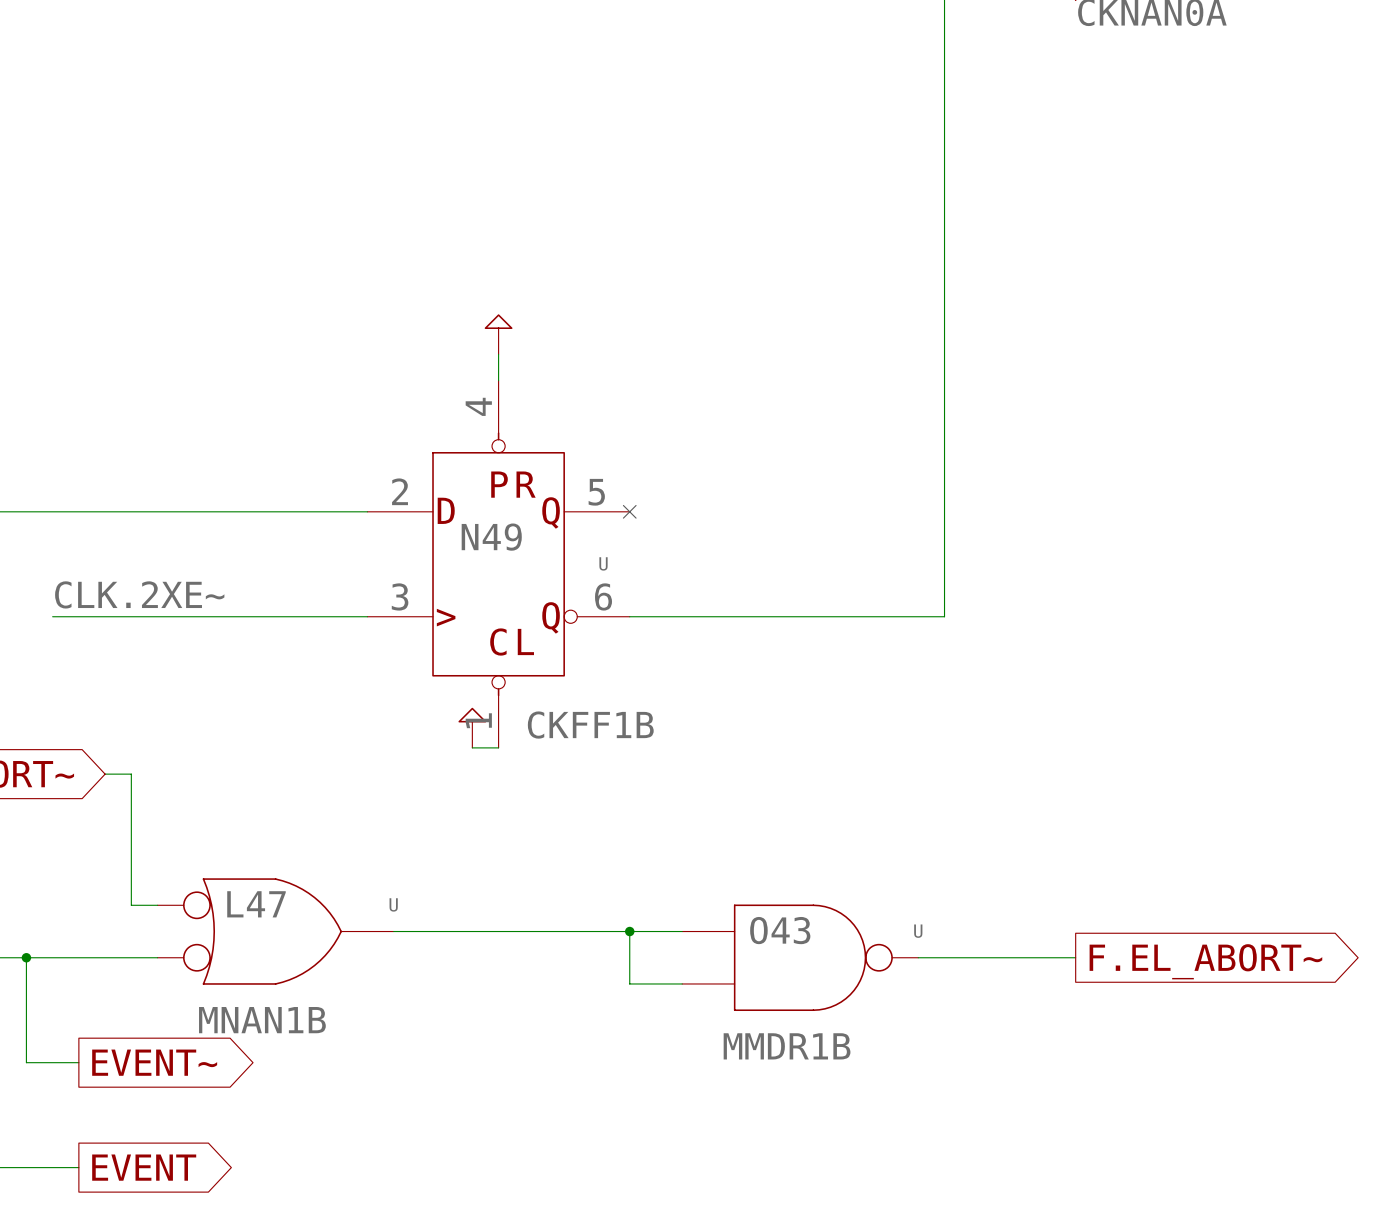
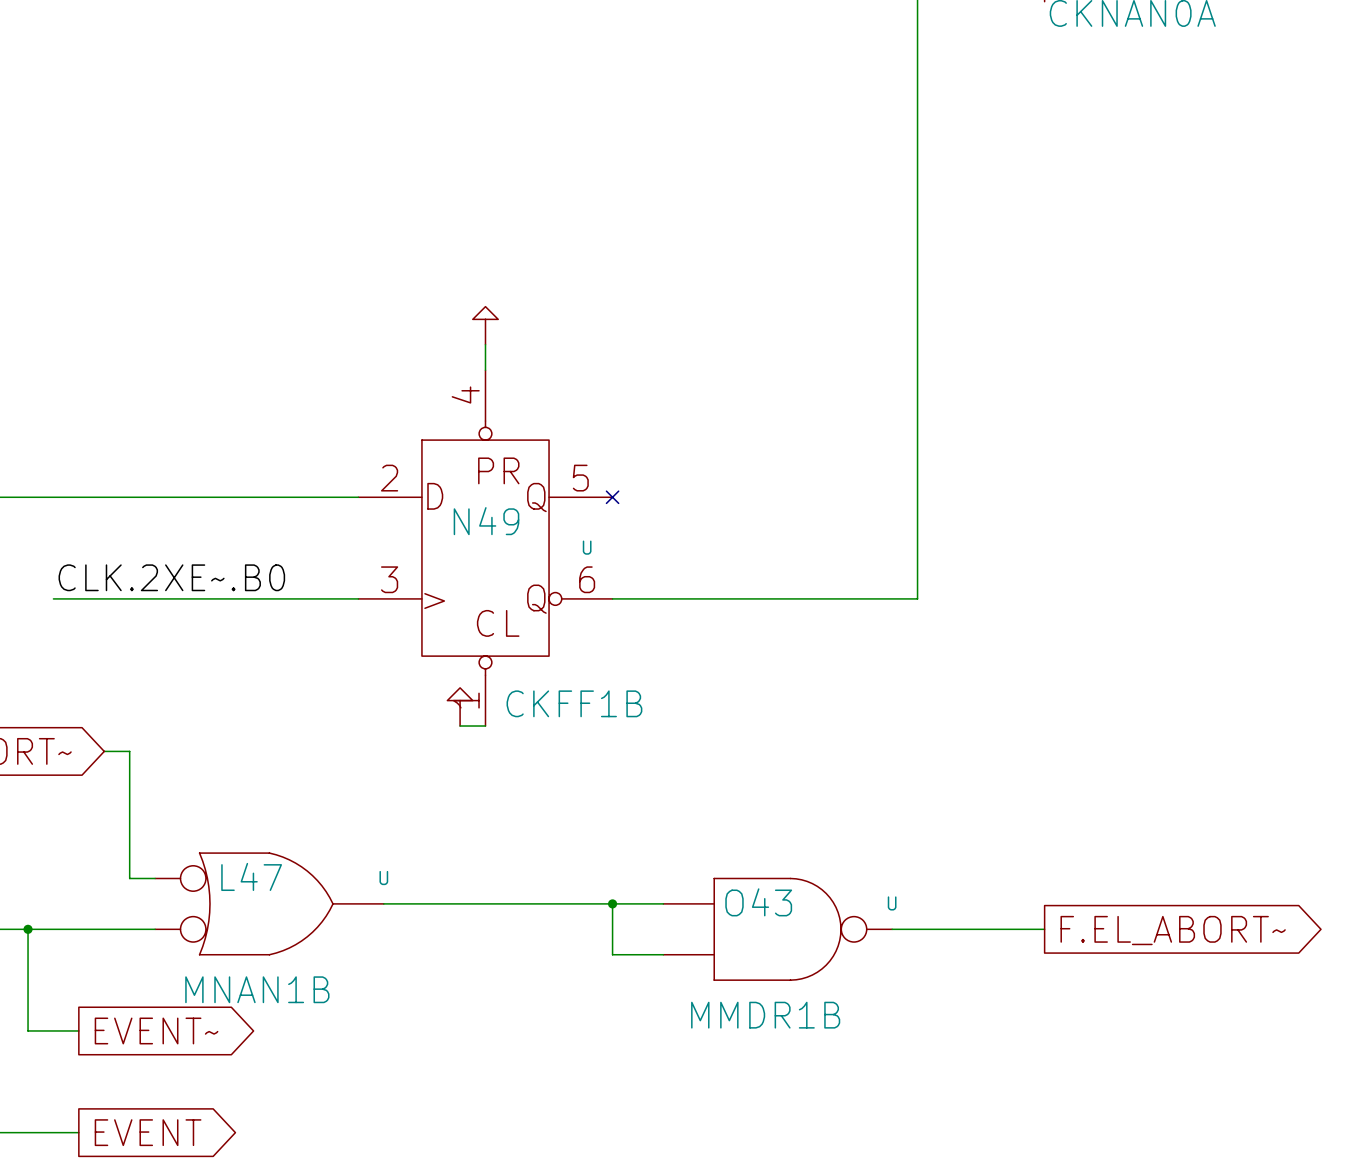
label: CLK.2XE~ (139, 594) -> CLK.2XE~.B0 (171, 577)

